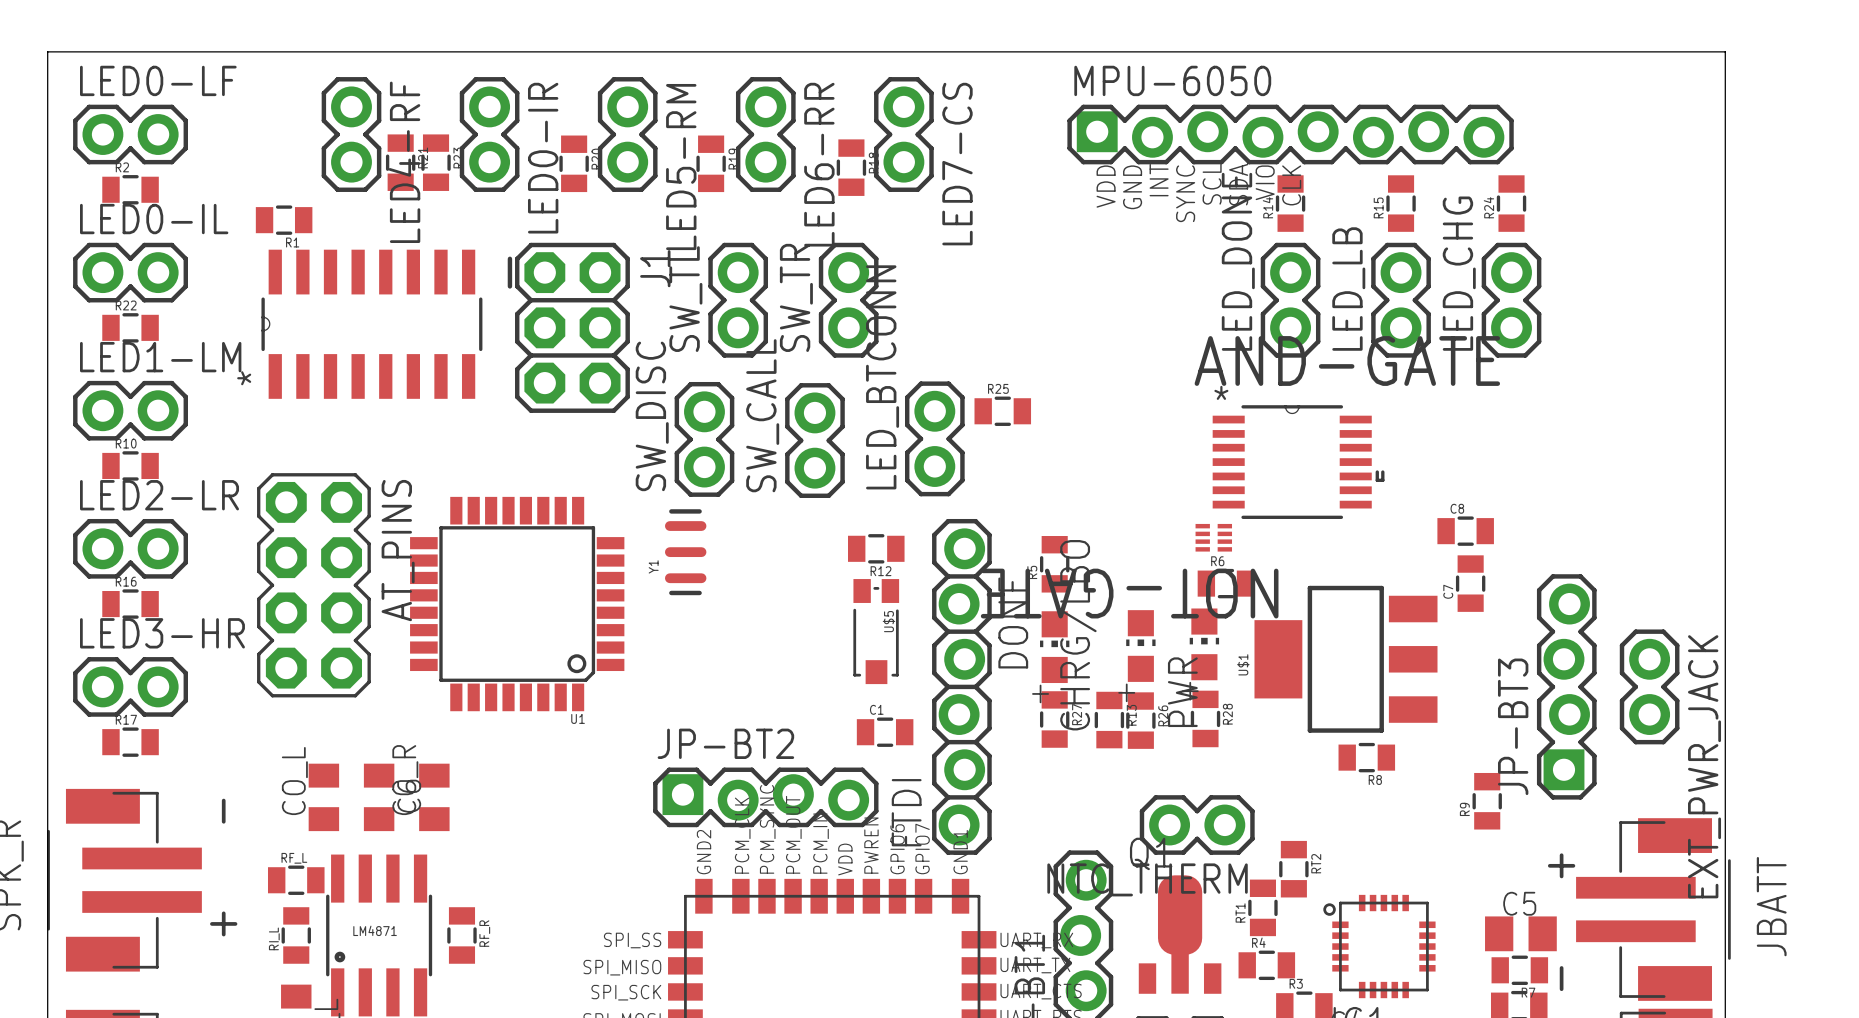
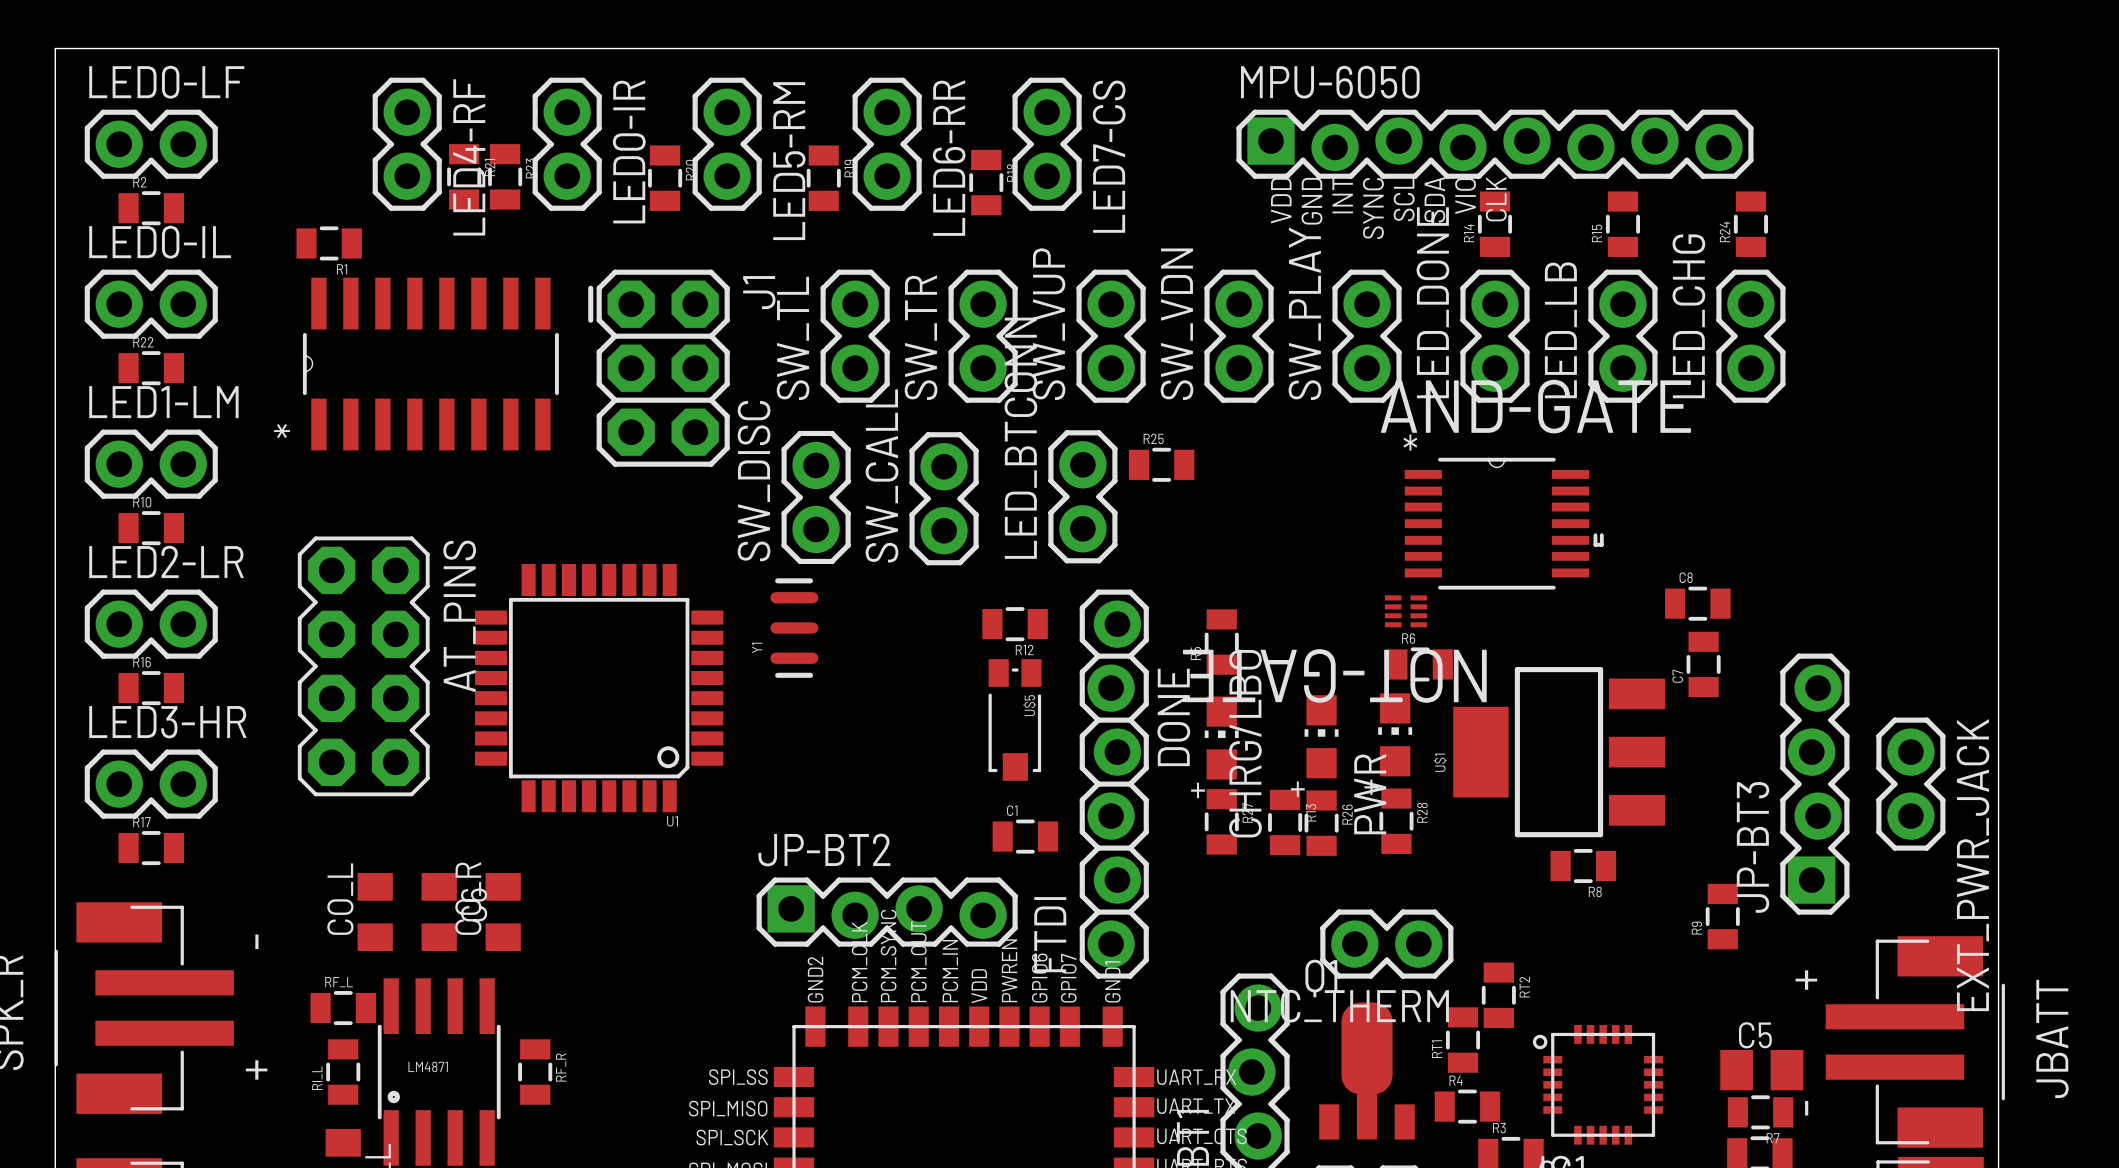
SW_VUP: none -> (1111, 336)
SW_VDN: none -> (1239, 336)
SW_PLAY: none -> (1367, 336)

